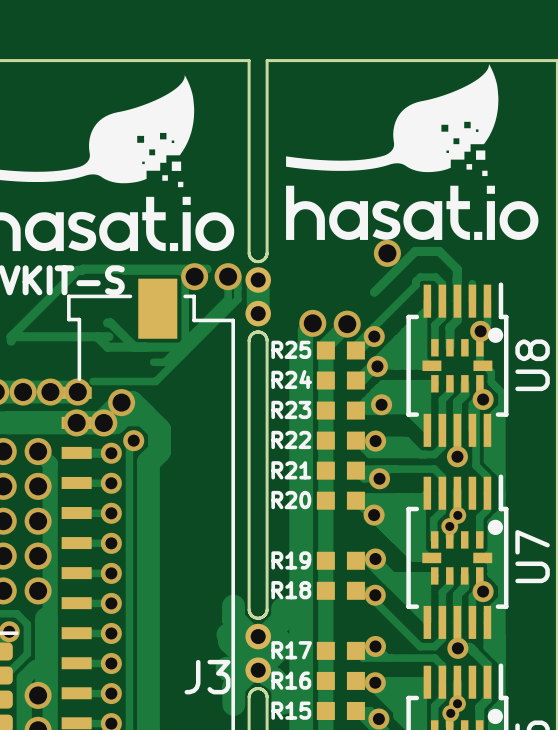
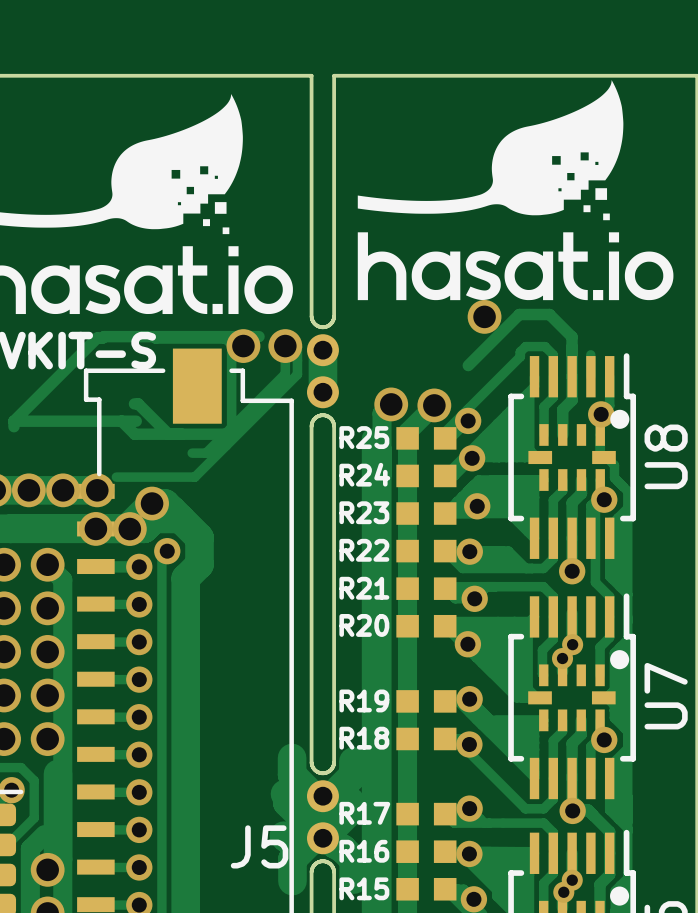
J3 name: J3 (207, 677) -> J5 (259, 846)

